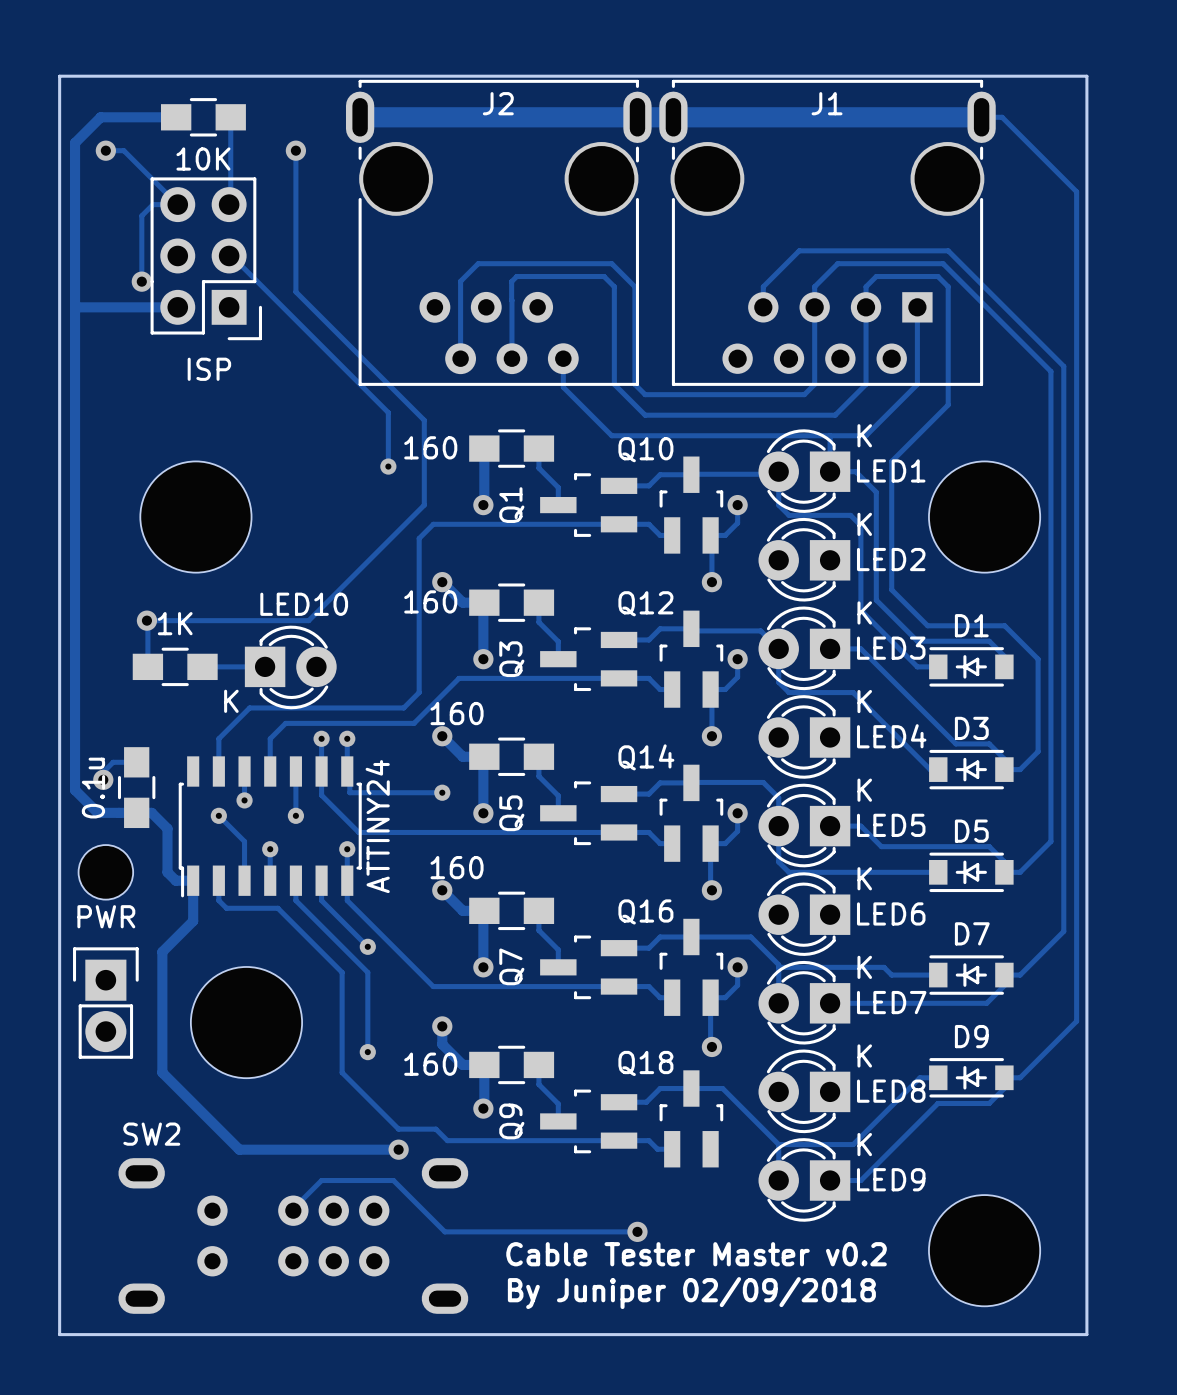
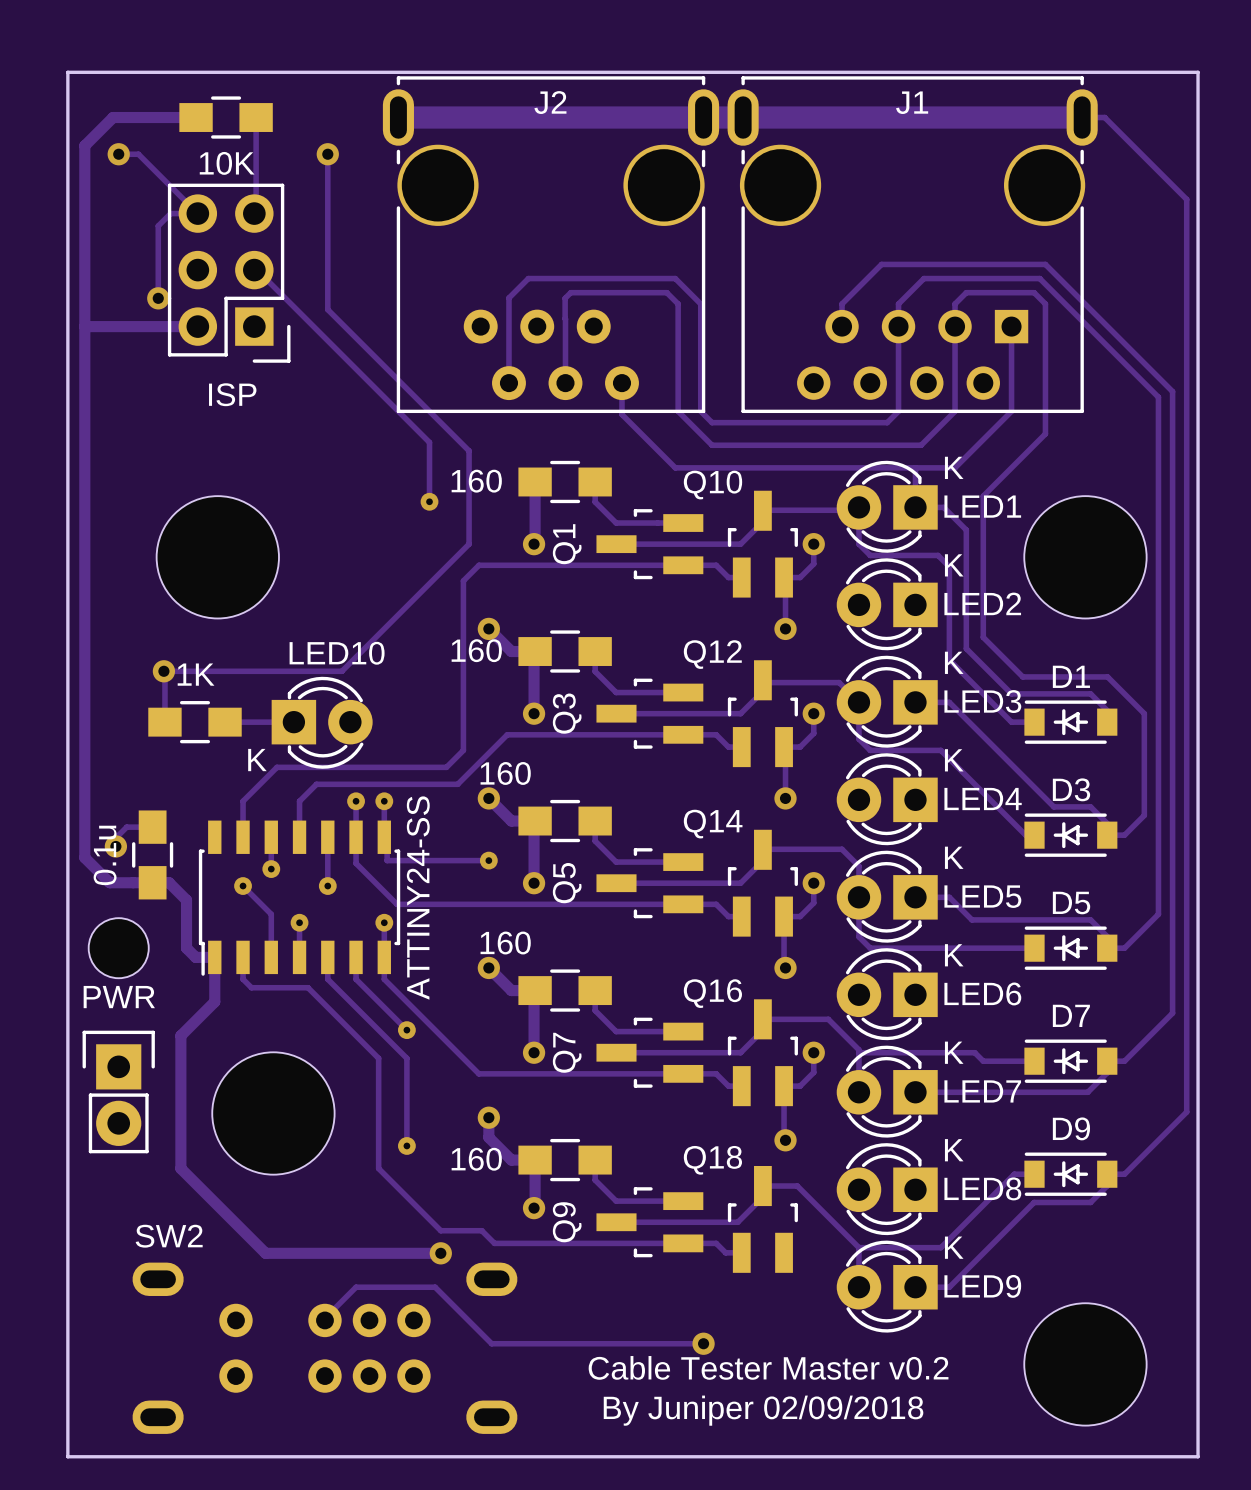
track: (538, 466) (558, 487) (558, 505) -> (595, 502) (616, 523) (683, 523)
track: (691, 474) (660, 474) (648, 485) (619, 485) -> (762, 510) (762, 521) (740, 544) (616, 544)
track: (538, 620) (558, 641) (558, 659) -> (595, 671) (616, 692) (683, 692)
track: (691, 628) (660, 628) (648, 639) (619, 639) -> (762, 680) (762, 691) (740, 713) (616, 713)
track: (538, 774) (558, 795) (558, 813) -> (595, 841) (616, 862) (683, 862)
track: (691, 782) (660, 782) (648, 794) (619, 794) -> (762, 849) (762, 860) (740, 883) (616, 883)
part value: ATTINY24 (377, 826) -> ATTINY24-SS (418, 898)
track: (538, 929) (558, 949) (558, 967) -> (595, 1010) (616, 1031) (683, 1031)
track: (691, 937) (660, 937) (648, 948) (619, 948) -> (762, 1019) (762, 1030) (740, 1052) (616, 1052)
track: (538, 1083) (558, 1103) (558, 1121) -> (595, 1180) (616, 1201) (683, 1201)
track: (691, 1088) (660, 1088) (646, 1102) (619, 1102) -> (762, 1186) (762, 1197) (737, 1222) (616, 1222)

